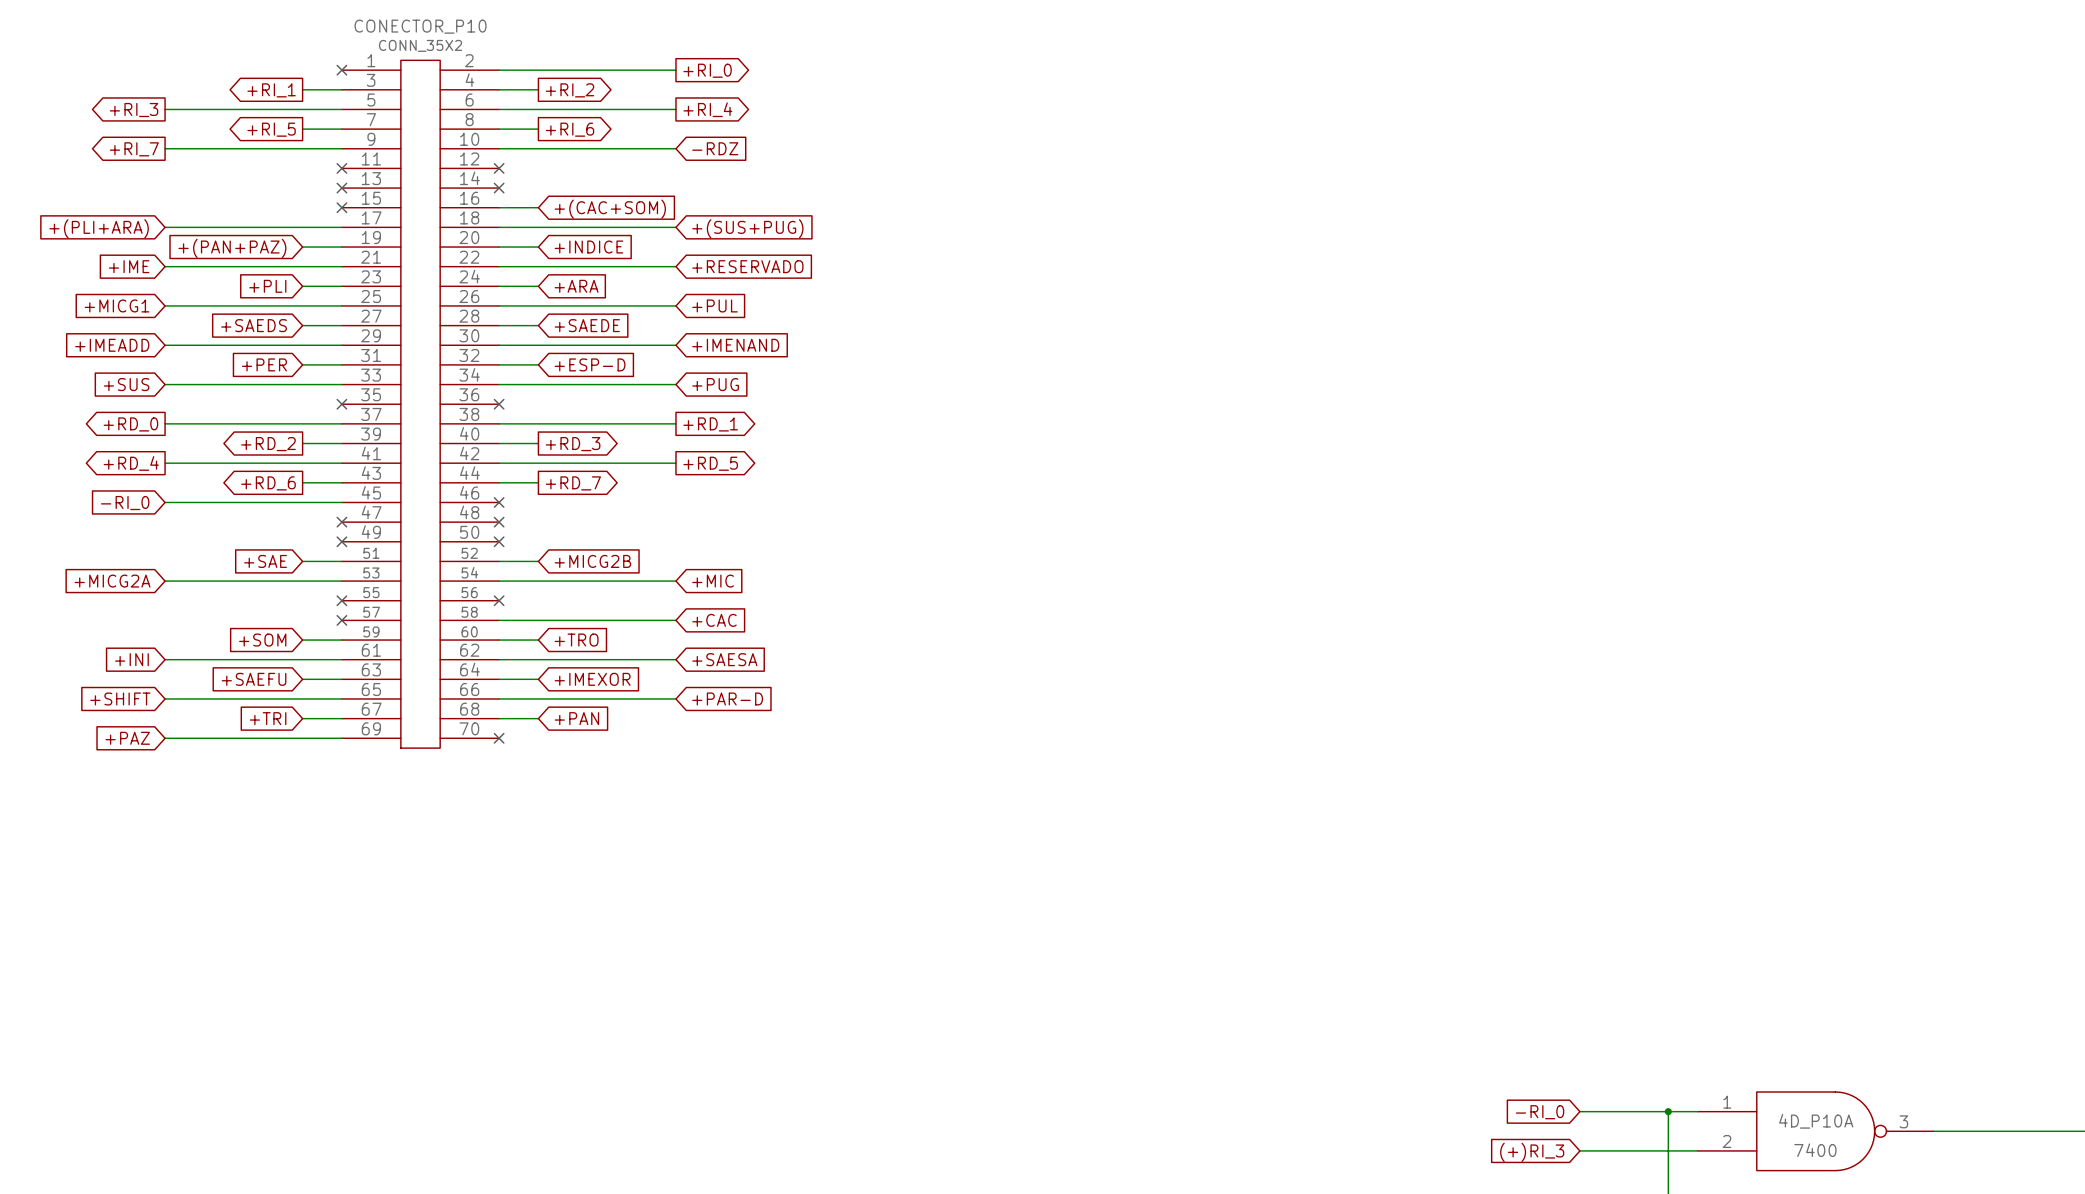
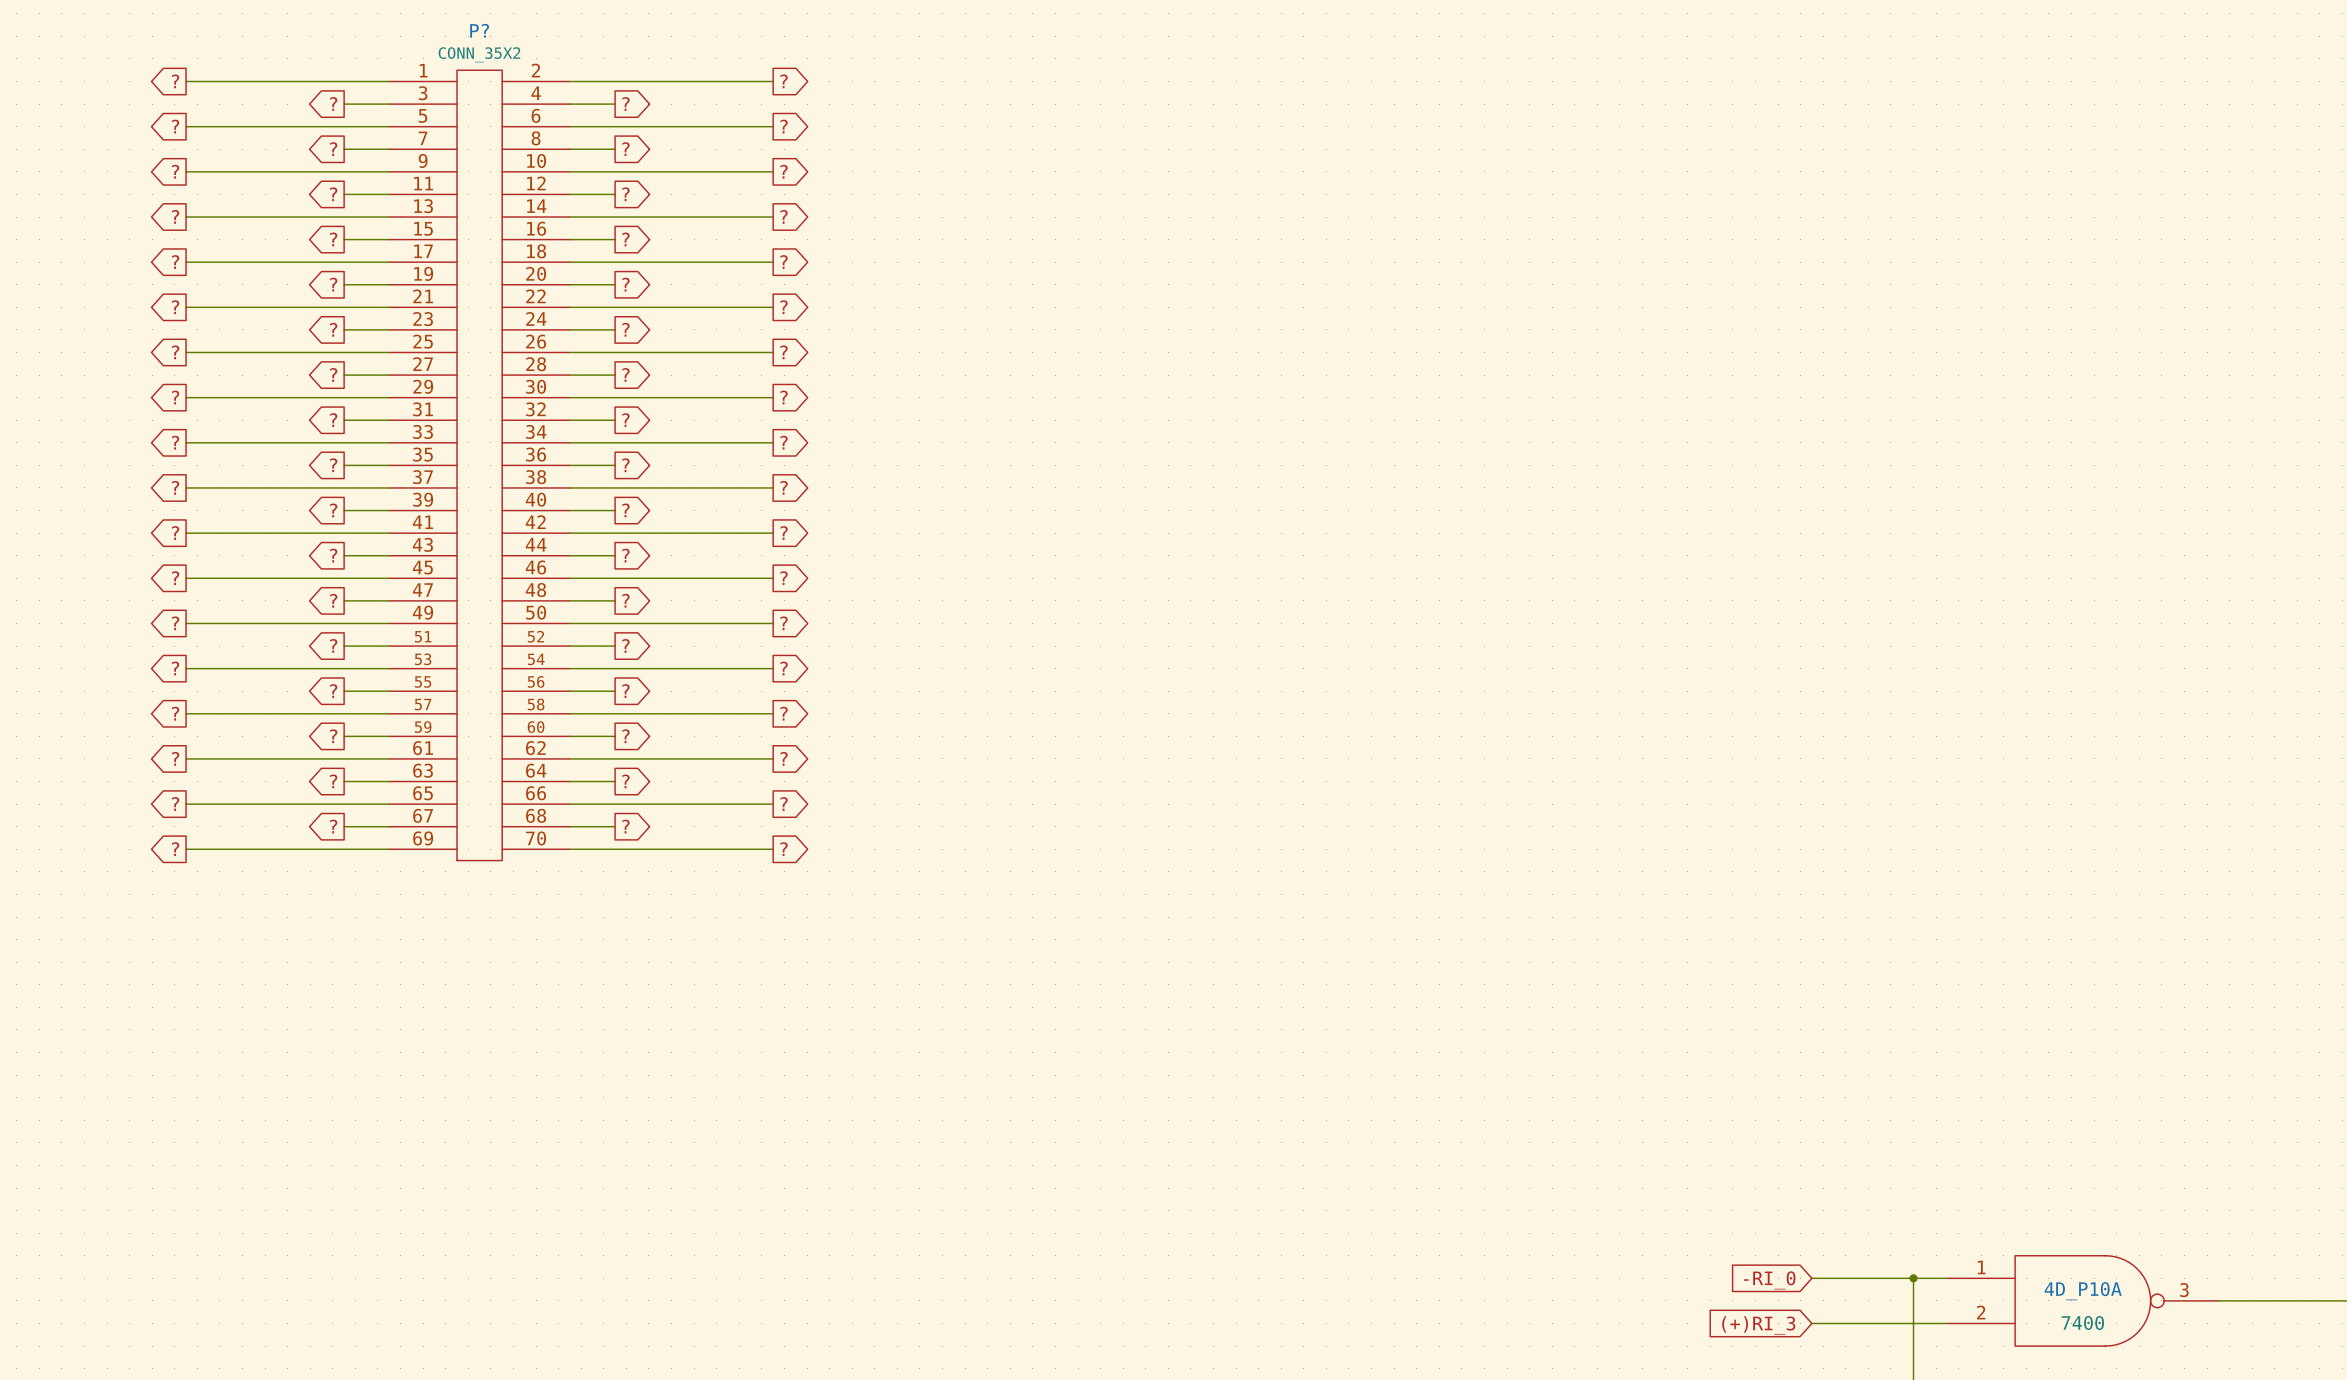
CONECTOR_P10 name: CONECTOR_P10 (420, 26) -> P? (479, 30)
global label: none -> ? (175, 81)
wire: none -> (186, 81) (389, 81)
no-connect mark: (341, 70) -> none
global label: +RI_0 (707, 70) -> ? (784, 81)
global label: +RI_1 (271, 90) -> ? (333, 103)
global label: +RI_2 (570, 90) -> ? (625, 103)
global label: +RI_4 (707, 109) -> ? (784, 126)
global label: +RI_3 (134, 110) -> ? (175, 126)
global label: +RI_5 (271, 129) -> ? (333, 149)
global label: +RI_6 (570, 129) -> ? (625, 149)
global label shape: input (715, 148) -> output (784, 171)
global label: -RDZ (715, 148) -> ? (784, 171)
global label: +RI_7 (134, 149) -> ? (175, 171)
global label: none -> ? (333, 194)
wire: none -> (344, 194) (389, 194)
no-connect mark: (341, 168) -> none
wire: none -> (569, 194) (615, 194)
no-connect mark: (499, 168) -> none
global label: none -> ? (625, 194)
global label: none -> ? (175, 216)
wire: none -> (186, 217) (389, 217)
no-connect mark: (341, 188) -> none
wire: none -> (569, 217) (773, 217)
no-connect mark: (499, 188) -> none
global label: none -> ? (784, 216)
global label: none -> ? (333, 239)
wire: none -> (344, 239) (389, 239)
no-connect mark: (341, 207) -> none
global label shape: input (610, 209) -> output (625, 239)
global label: +(CAC+SOM) (610, 209) -> ? (625, 239)
global label shape: input (99, 228) -> output (175, 262)
global label: +(PLI+ARA) (99, 228) -> ? (175, 262)
global label shape: input (747, 228) -> output (784, 262)
global label: +(SUS+PUG) (747, 228) -> ? (784, 262)
global label shape: input (588, 247) -> output (625, 284)
global label: +INDICE (588, 247) -> ? (625, 284)
global label shape: input (232, 248) -> output (333, 284)
global label: +(PAN+PAZ) (232, 248) -> ? (333, 284)
global label shape: input (129, 266) -> output (175, 307)
global label: +IME (129, 266) -> ? (175, 307)
global label shape: input (747, 266) -> output (784, 307)
global label: +RESERVADO (747, 266) -> ? (784, 307)
global label shape: input (267, 286) -> output (333, 329)
global label: +PLI (267, 286) -> ? (333, 329)
global label shape: input (576, 286) -> output (625, 329)
global label: +ARA (576, 286) -> ? (625, 329)
global label shape: input (117, 305) -> output (175, 352)
global label: +MICG1 (117, 305) -> ? (175, 352)
global label shape: input (715, 305) -> output (784, 352)
global label: +PUL (715, 305) -> ? (784, 352)
global label shape: input (254, 325) -> output (333, 374)
global label: +SAEDS (254, 325) -> ? (333, 374)
global label shape: input (587, 325) -> output (625, 374)
global label: +SAEDE (587, 325) -> ? (625, 374)
global label shape: input (112, 345) -> output (175, 397)
global label: +IMEADD (112, 345) -> ? (175, 397)
global label shape: input (735, 345) -> output (784, 397)
global label: +IMENAND (735, 345) -> ? (784, 397)
global label shape: input (264, 364) -> output (333, 420)
global label: +PER (264, 364) -> ? (333, 420)
global label shape: input (590, 364) -> output (625, 420)
global label: +ESP-D (590, 364) -> ? (625, 420)
global label shape: input (126, 384) -> output (175, 442)
global label: +SUS (126, 384) -> ? (175, 442)
global label shape: input (715, 384) -> output (784, 442)
global label: +PUG (715, 384) -> ? (784, 442)
global label: none -> ? (333, 465)
wire: none -> (344, 465) (389, 465)
no-connect mark: (341, 404) -> none
wire: none -> (569, 465) (615, 465)
no-connect mark: (499, 404) -> none
global label: none -> ? (625, 465)
global label: +RD_0 (130, 424) -> ? (175, 487)
global label: +RD_1 (710, 424) -> ? (784, 487)
global label: +RD_2 (268, 444) -> ? (333, 510)
global label: +RD_3 (573, 444) -> ? (625, 510)
global label: +RD_4 (131, 463) -> ? (175, 533)
global label: +RD_5 (710, 463) -> ? (784, 533)
global label: +RD_6 (268, 483) -> ? (333, 555)
global label: +RD_7 (573, 483) -> ? (625, 555)
wire: none -> (569, 578) (773, 578)
no-connect mark: (499, 502) -> none
global label: none -> ? (784, 578)
global label shape: input (125, 503) -> output (175, 578)
global label: -RI_0 (125, 503) -> ? (175, 578)
global label: none -> ? (333, 600)
wire: none -> (344, 600) (389, 600)
no-connect mark: (341, 522) -> none
wire: none -> (569, 600) (615, 600)
no-connect mark: (499, 522) -> none
global label: none -> ? (625, 600)
global label: none -> ? (175, 623)
wire: none -> (186, 623) (389, 623)
no-connect mark: (341, 541) -> none
wire: none -> (569, 623) (773, 623)
no-connect mark: (499, 541) -> none
global label: none -> ? (784, 623)
global label shape: input (265, 561) -> output (333, 645)
global label: +SAE (265, 561) -> ? (333, 645)
global label shape: input (592, 561) -> output (625, 645)
global label: +MICG2B (592, 561) -> ? (625, 645)
global label shape: input (112, 581) -> output (175, 668)
global label: +MICG2A (112, 581) -> ? (175, 668)
global label shape: input (713, 581) -> output (784, 668)
global label: +MIC (713, 581) -> ? (784, 668)
global label: none -> ? (333, 691)
wire: none -> (344, 691) (389, 691)
no-connect mark: (341, 600) -> none
wire: none -> (569, 691) (615, 691)
no-connect mark: (499, 600) -> none
global label: none -> ? (625, 691)
global label: none -> ? (175, 713)
wire: none -> (186, 713) (389, 713)
no-connect mark: (341, 620) -> none
global label shape: input (714, 620) -> output (784, 713)
global label: +CAC (714, 620) -> ? (784, 713)
global label shape: input (262, 640) -> output (333, 736)
global label: +SOM (262, 640) -> ? (333, 736)
global label shape: input (576, 640) -> output (625, 736)
global label: +TRO (576, 640) -> ? (625, 736)
global label shape: input (131, 659) -> output (175, 758)
global label: +INI (131, 659) -> ? (175, 758)
global label shape: input (724, 659) -> output (784, 758)
global label: +SAESA (724, 659) -> ? (784, 758)
global label shape: input (254, 679) -> output (333, 781)
global label: +SAEFU (254, 679) -> ? (333, 781)
global label shape: input (592, 679) -> output (625, 781)
global label: +IMEXOR (592, 679) -> ? (625, 781)
global label shape: input (120, 698) -> output (175, 804)
global label: +SHIFT (120, 698) -> ? (175, 804)
global label shape: input (727, 698) -> output (784, 804)
global label: +PAR-D (727, 698) -> ? (784, 804)
global label shape: input (268, 718) -> output (333, 826)
global label: +TRI (268, 718) -> ? (333, 826)
global label shape: input (576, 718) -> output (625, 826)
global label: +PAN (576, 718) -> ? (625, 826)
global label shape: input (127, 738) -> output (175, 849)
global label: +PAZ (127, 738) -> ? (175, 849)
wire: none -> (569, 849) (773, 849)
no-connect mark: (499, 738) -> none
global label: none -> ? (784, 849)

